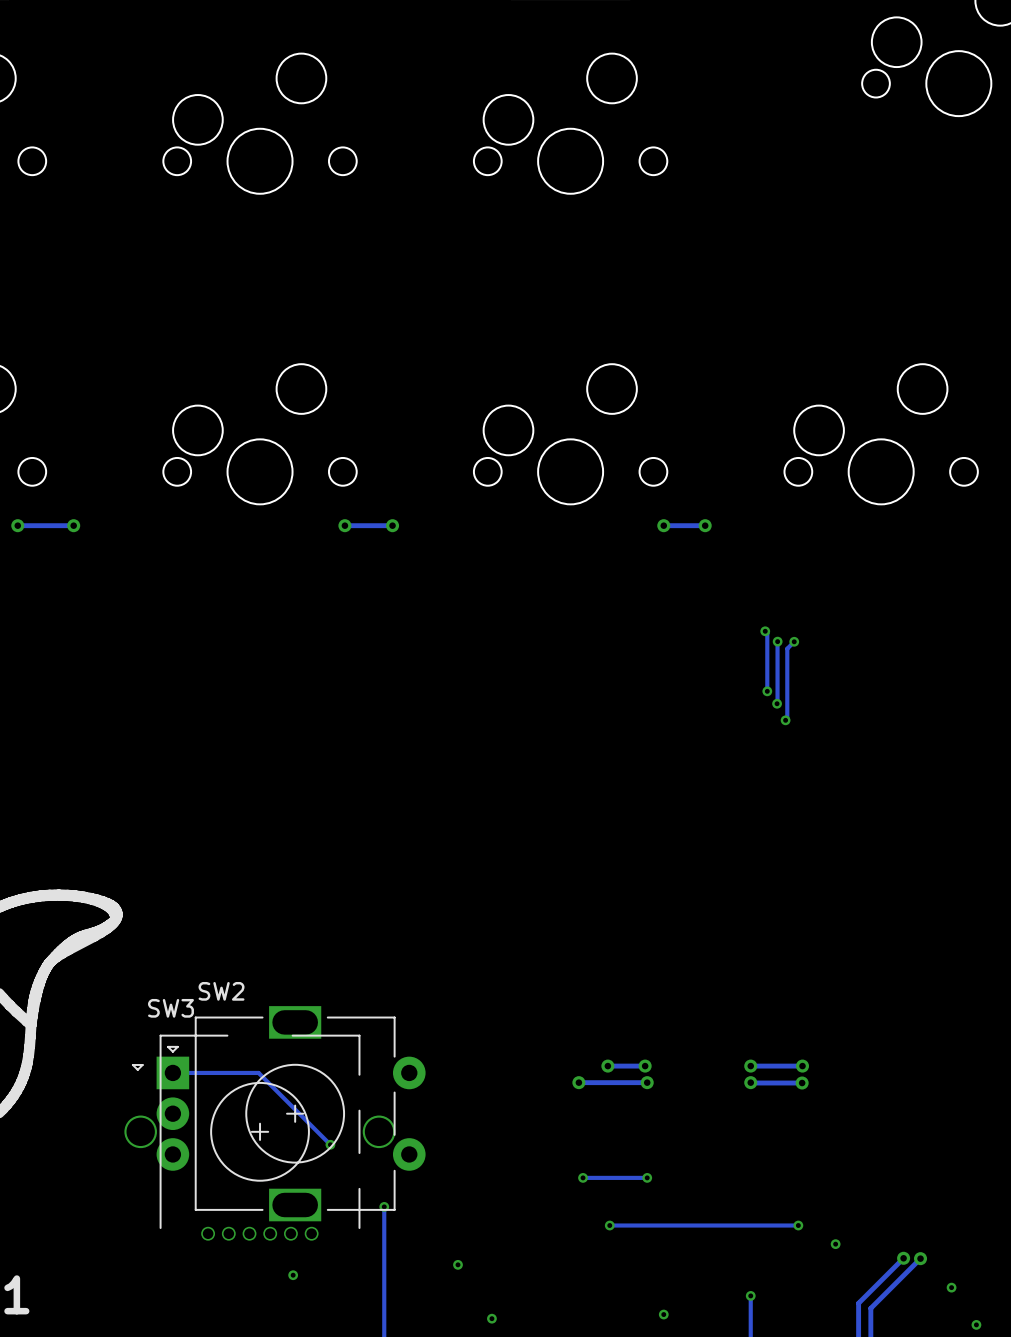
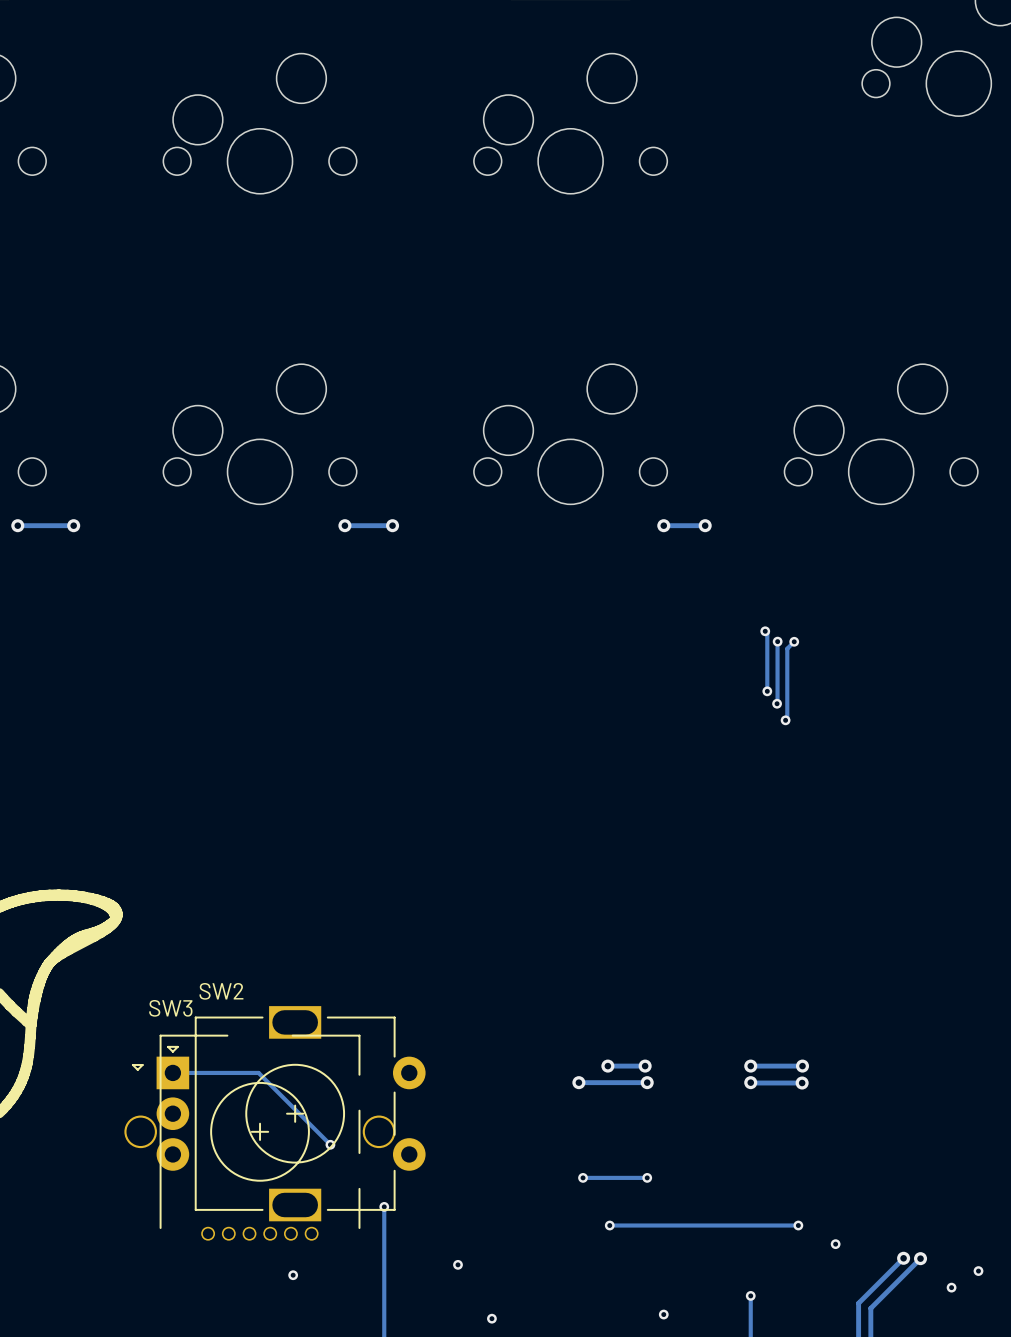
via position: (976, 1324) -> (978, 1271)

